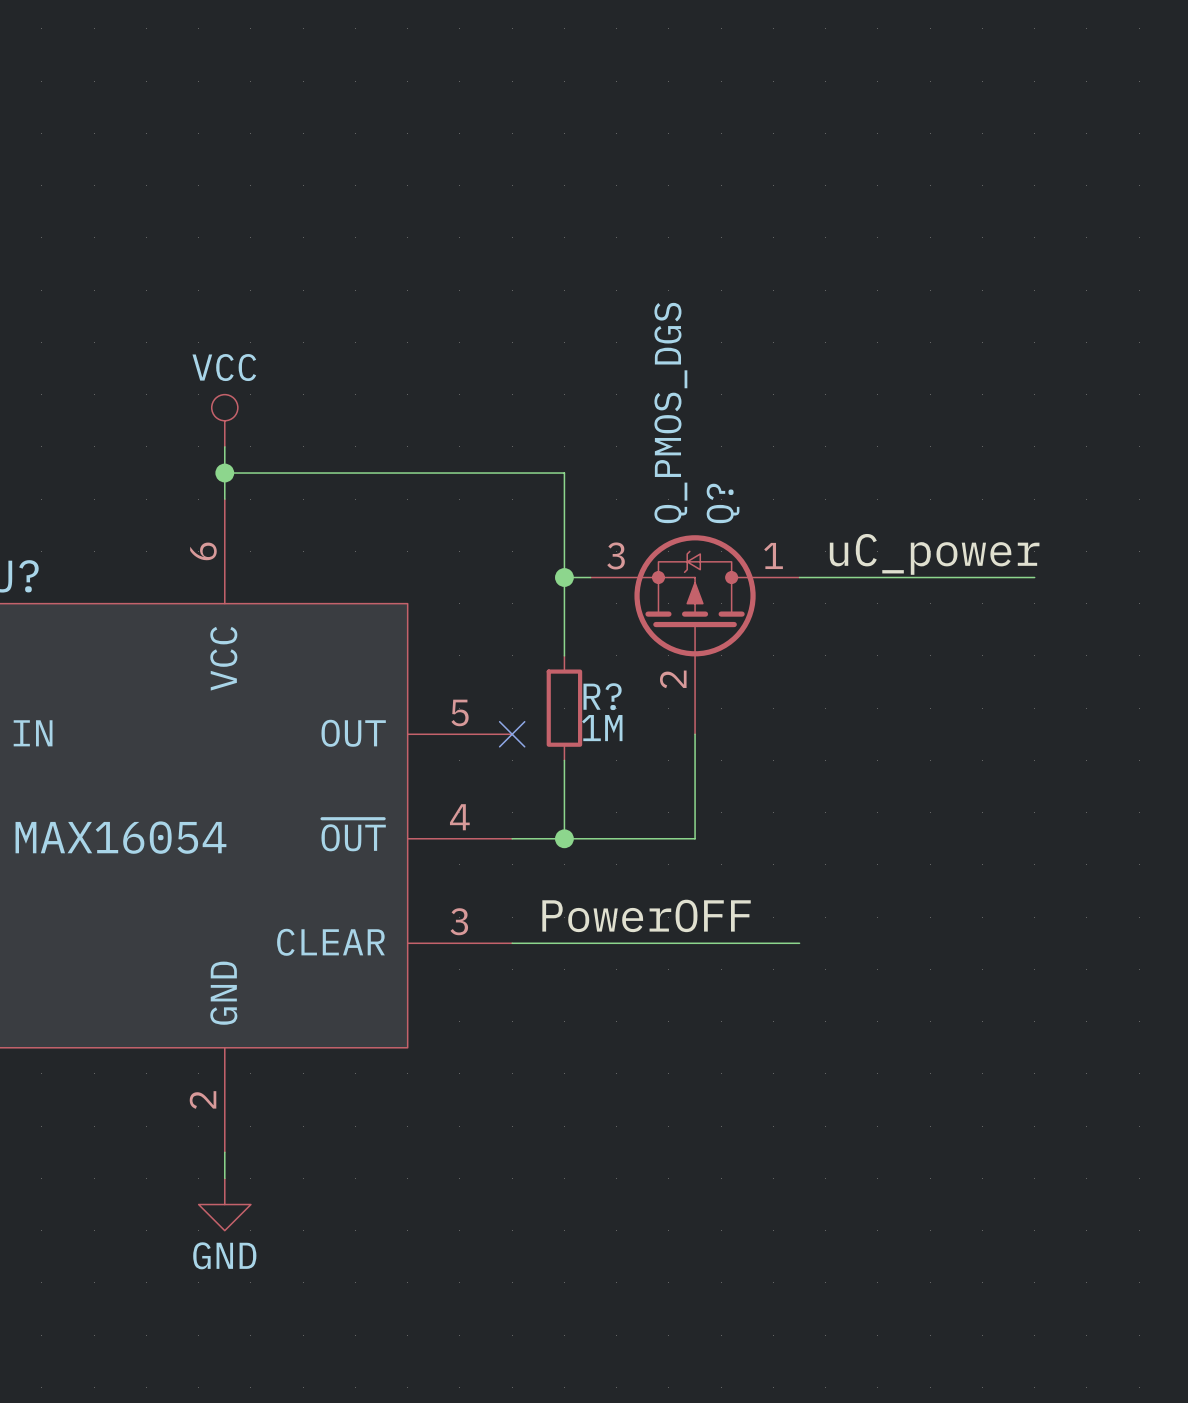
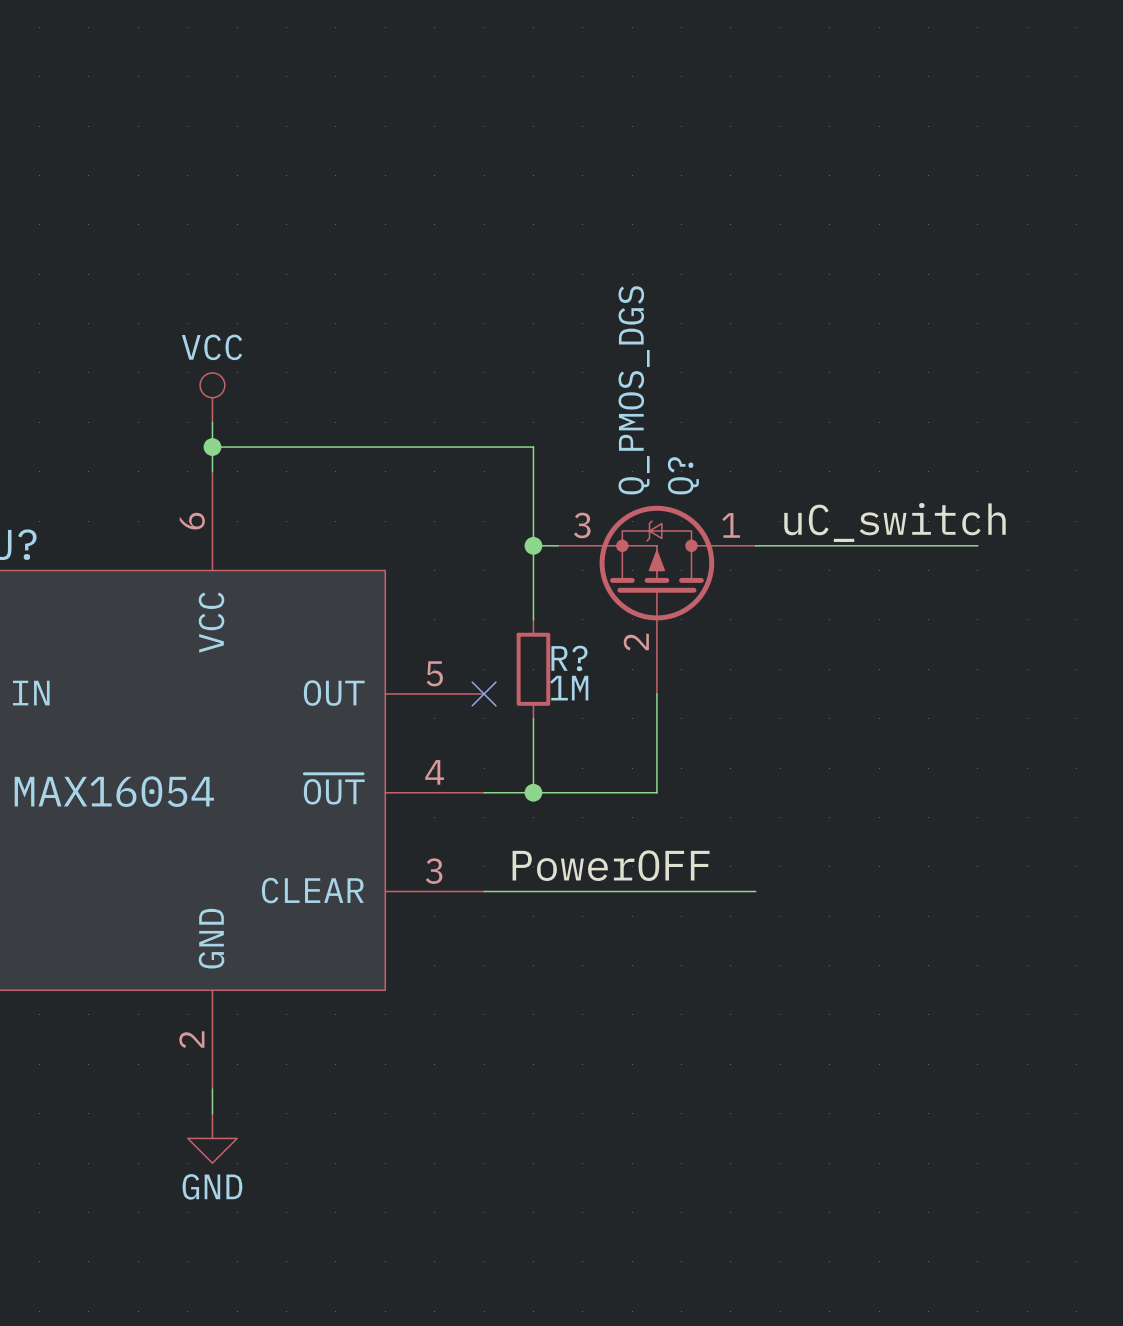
label: uC_power (934, 554) -> uC_switch (894, 522)

